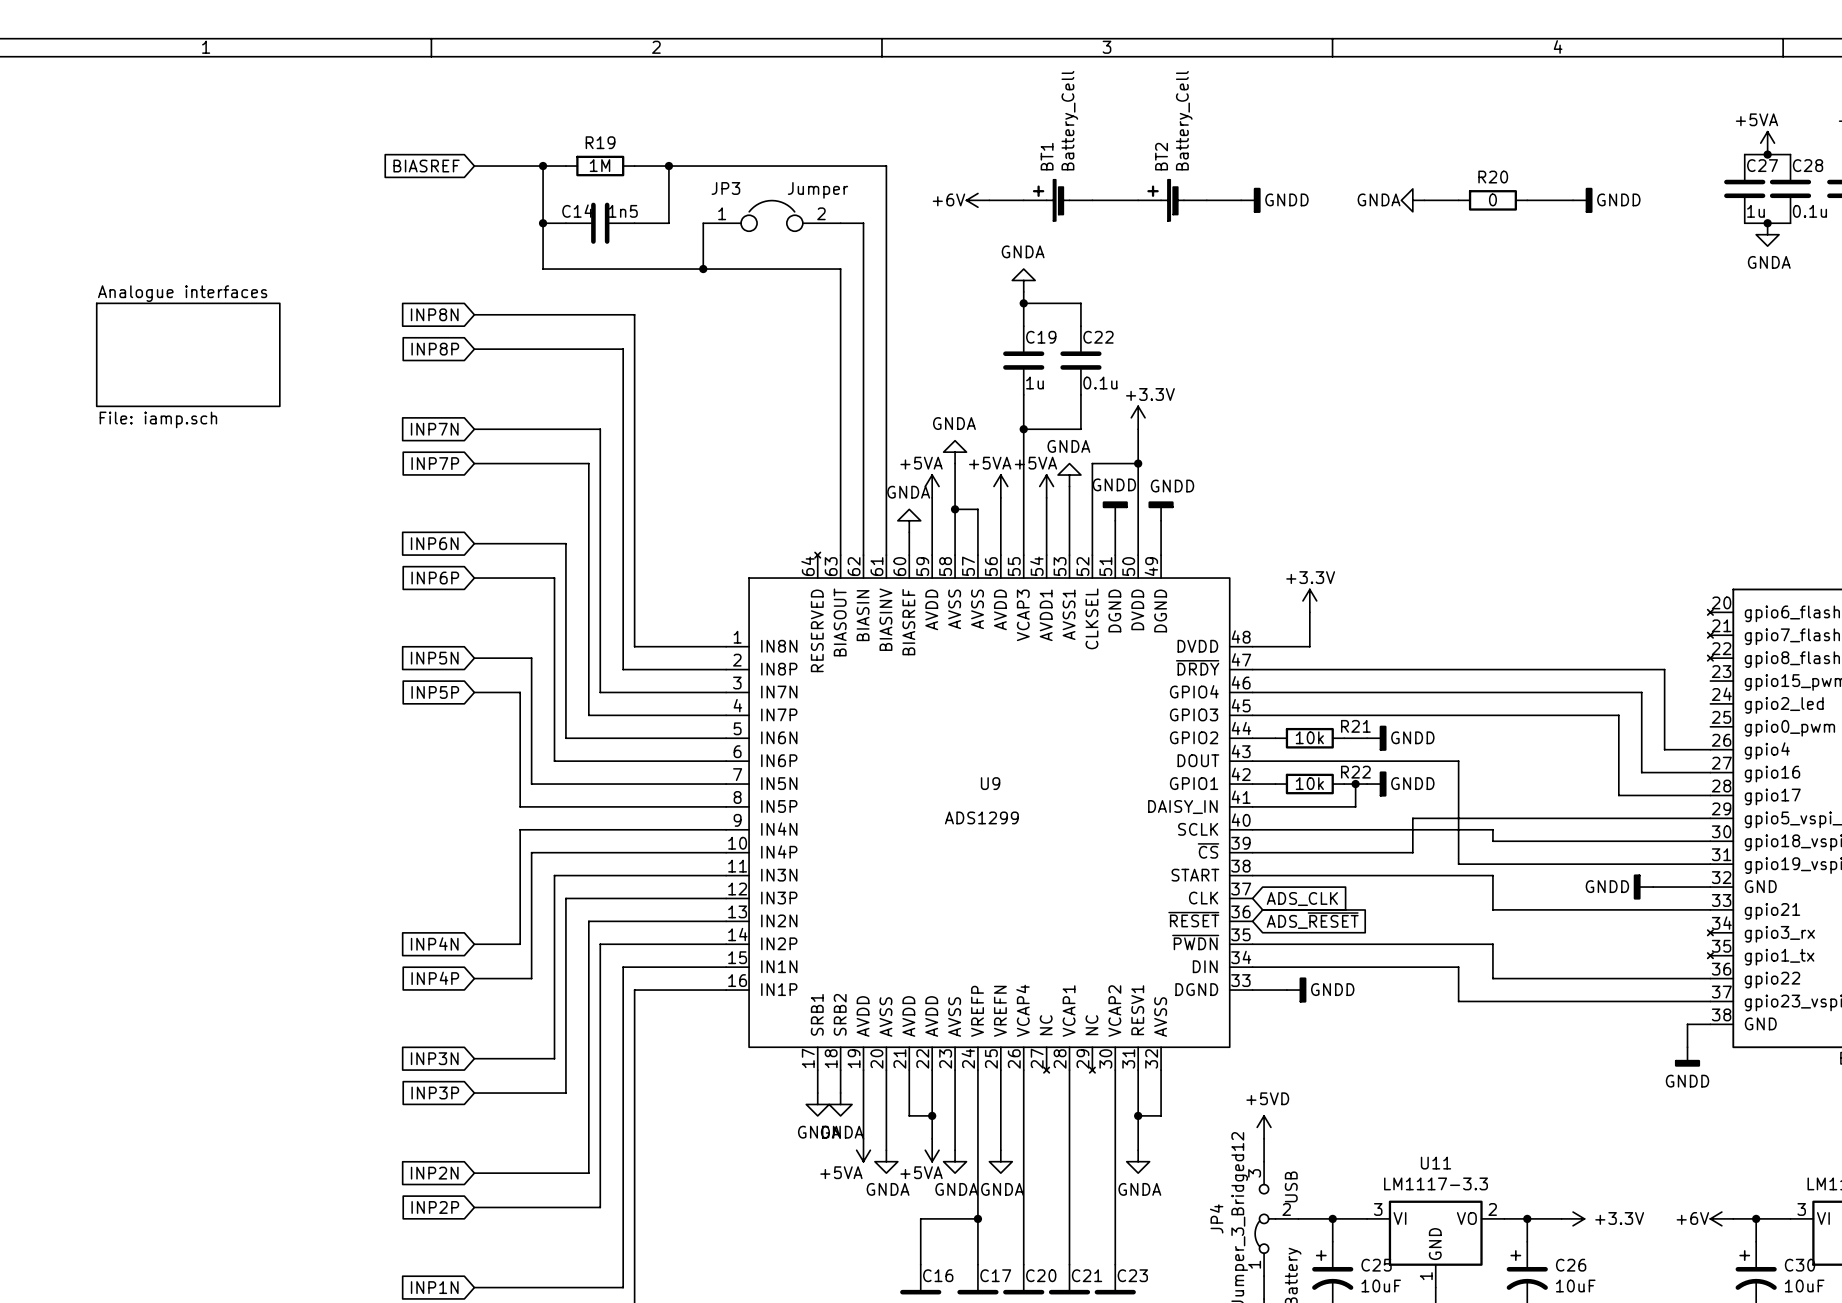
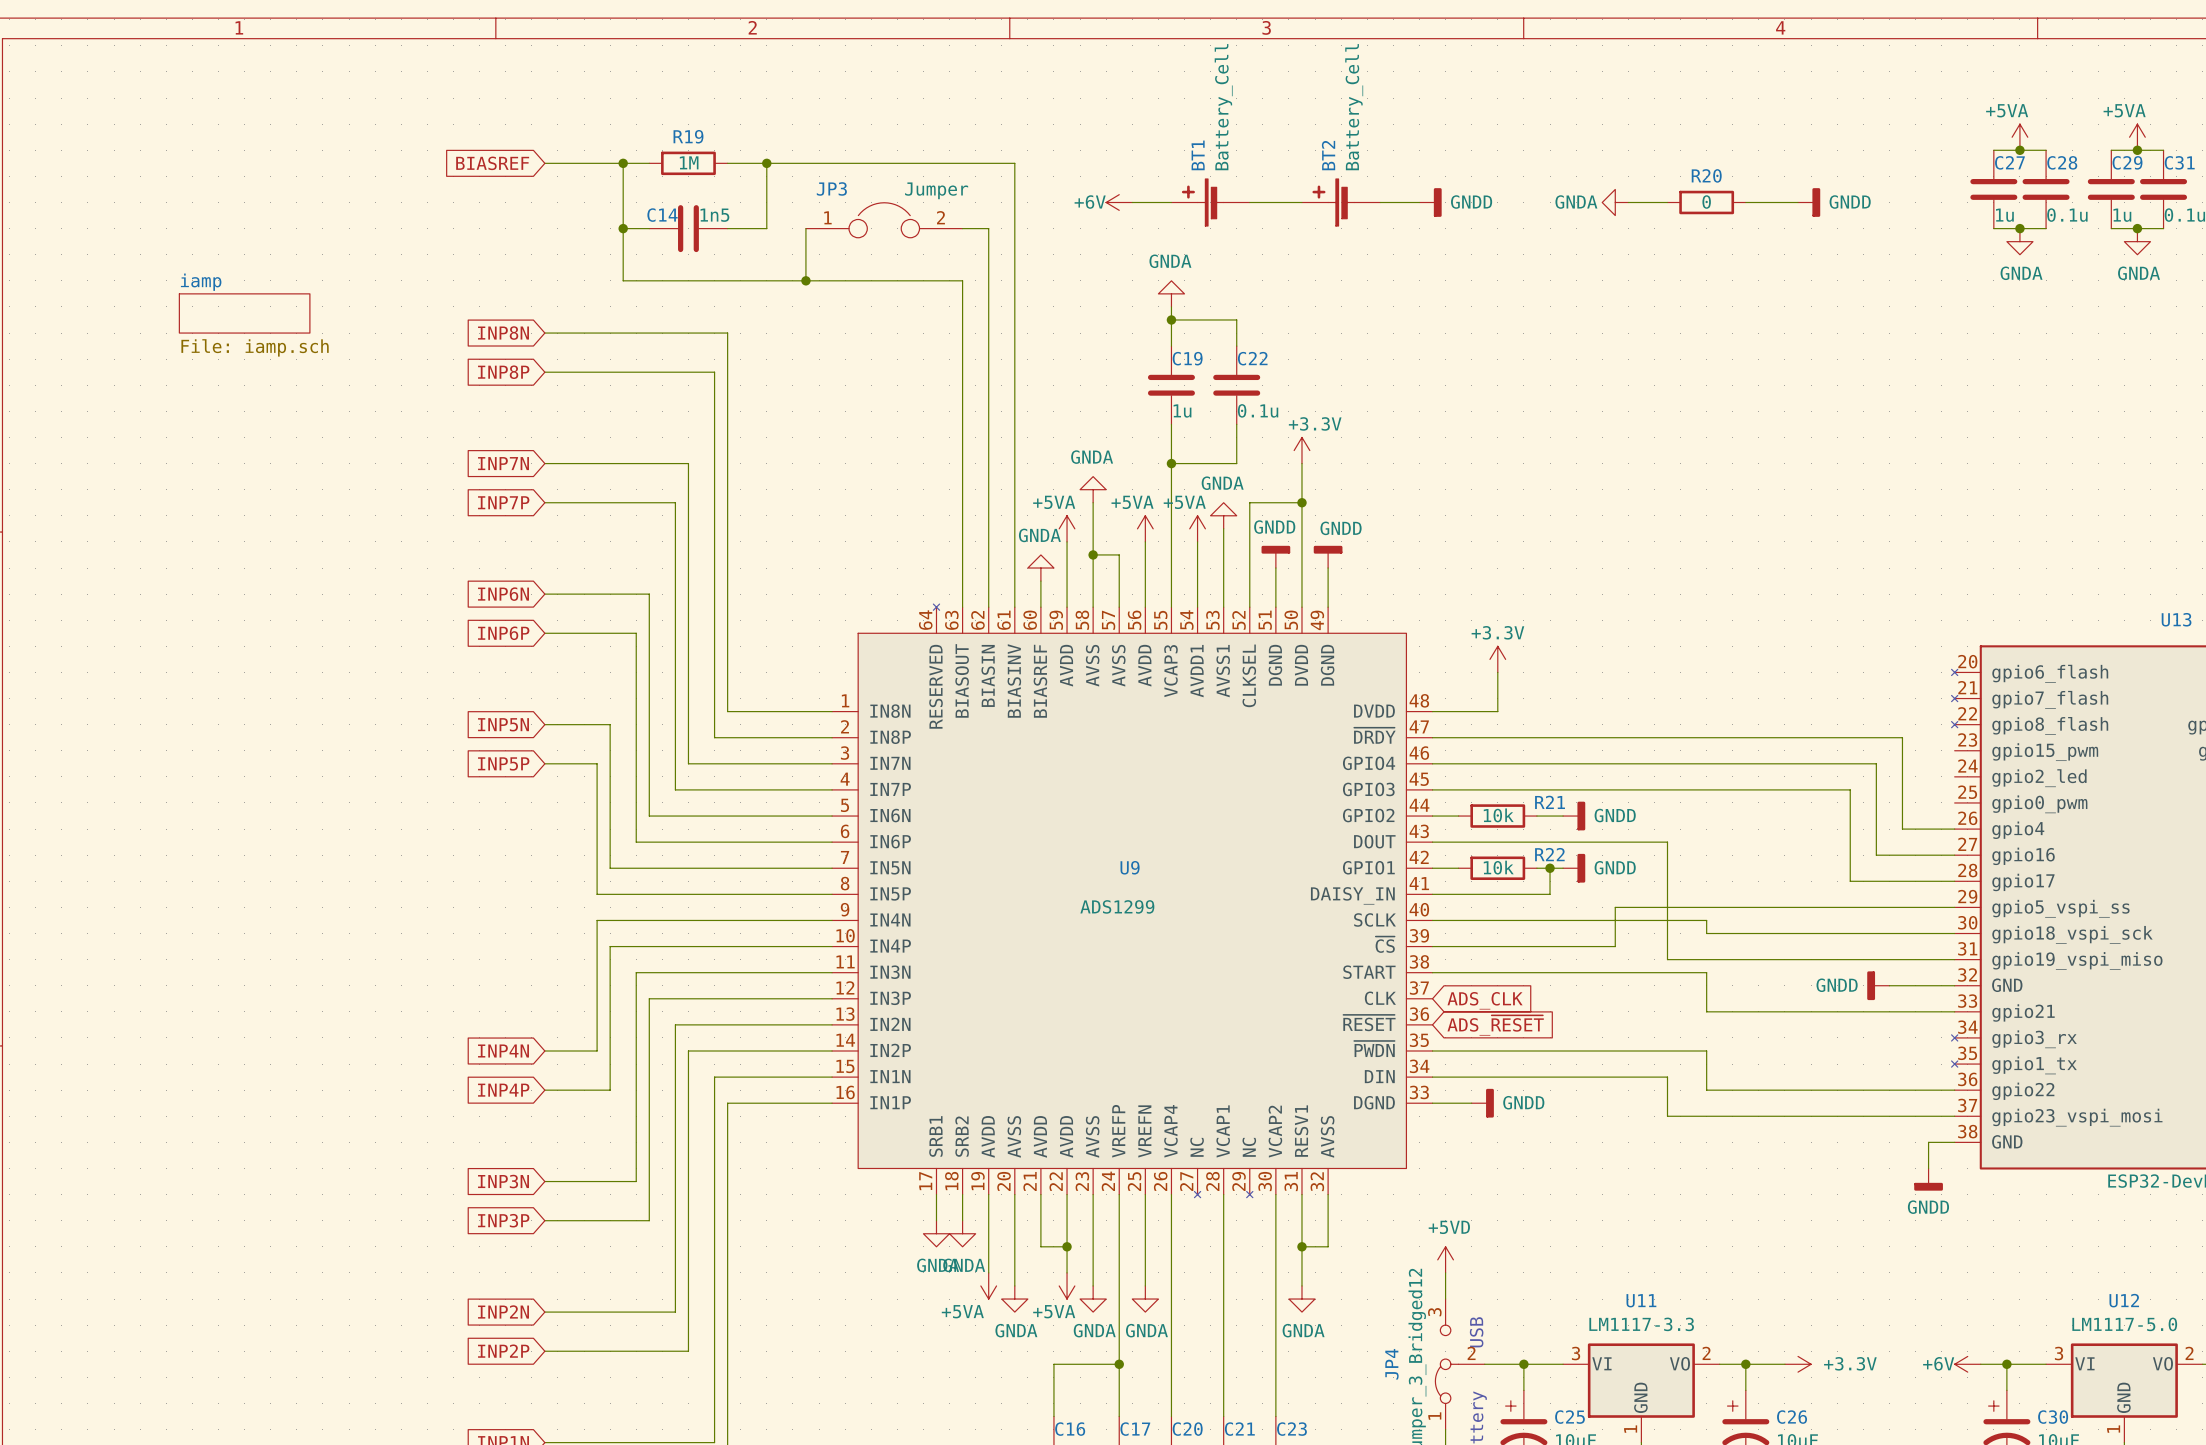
sheet iamp: none -> File: iamp.sch (244, 313)
sheet Analogue interfaces: File: iamp.sch (188, 354) -> none

